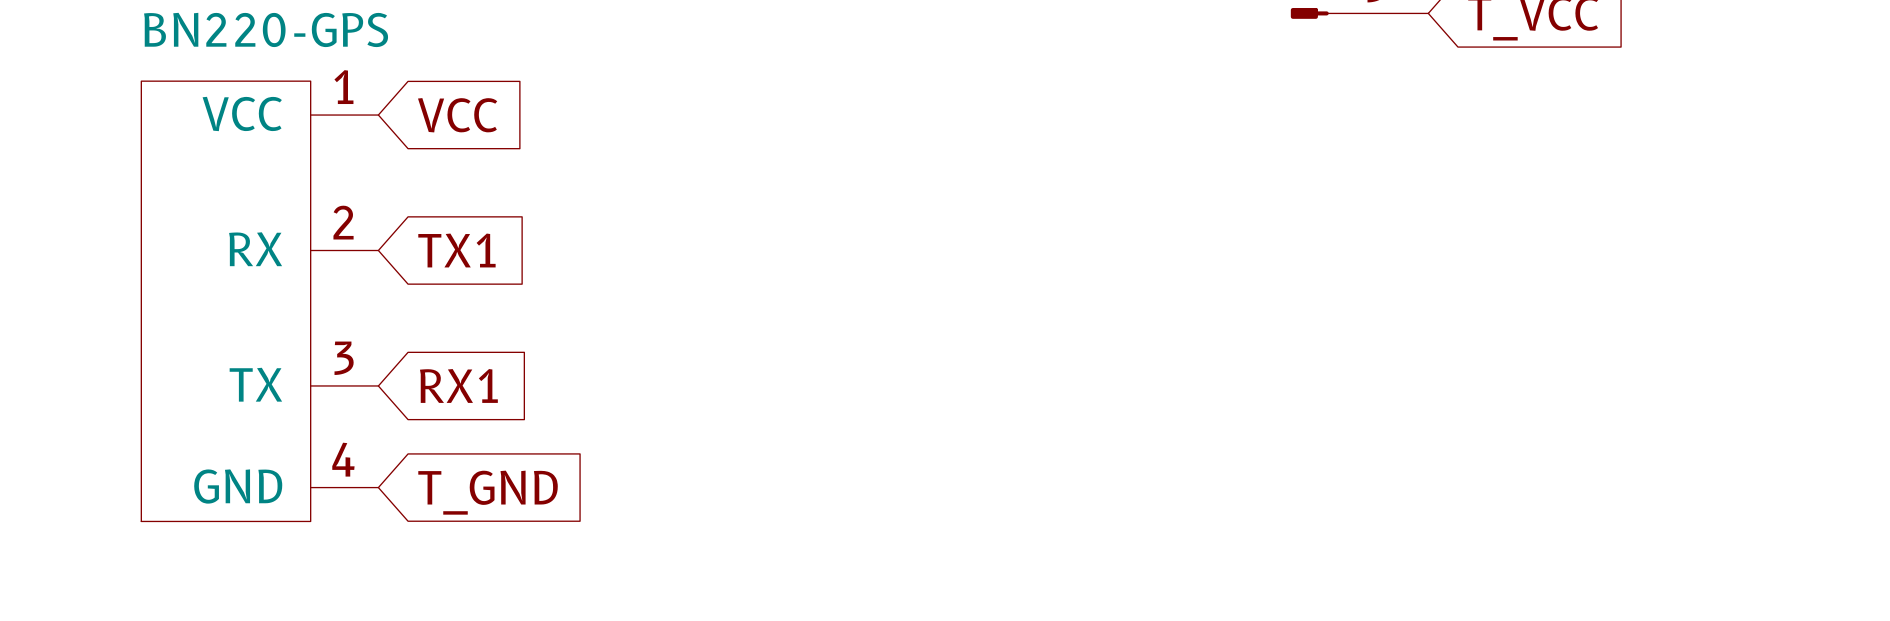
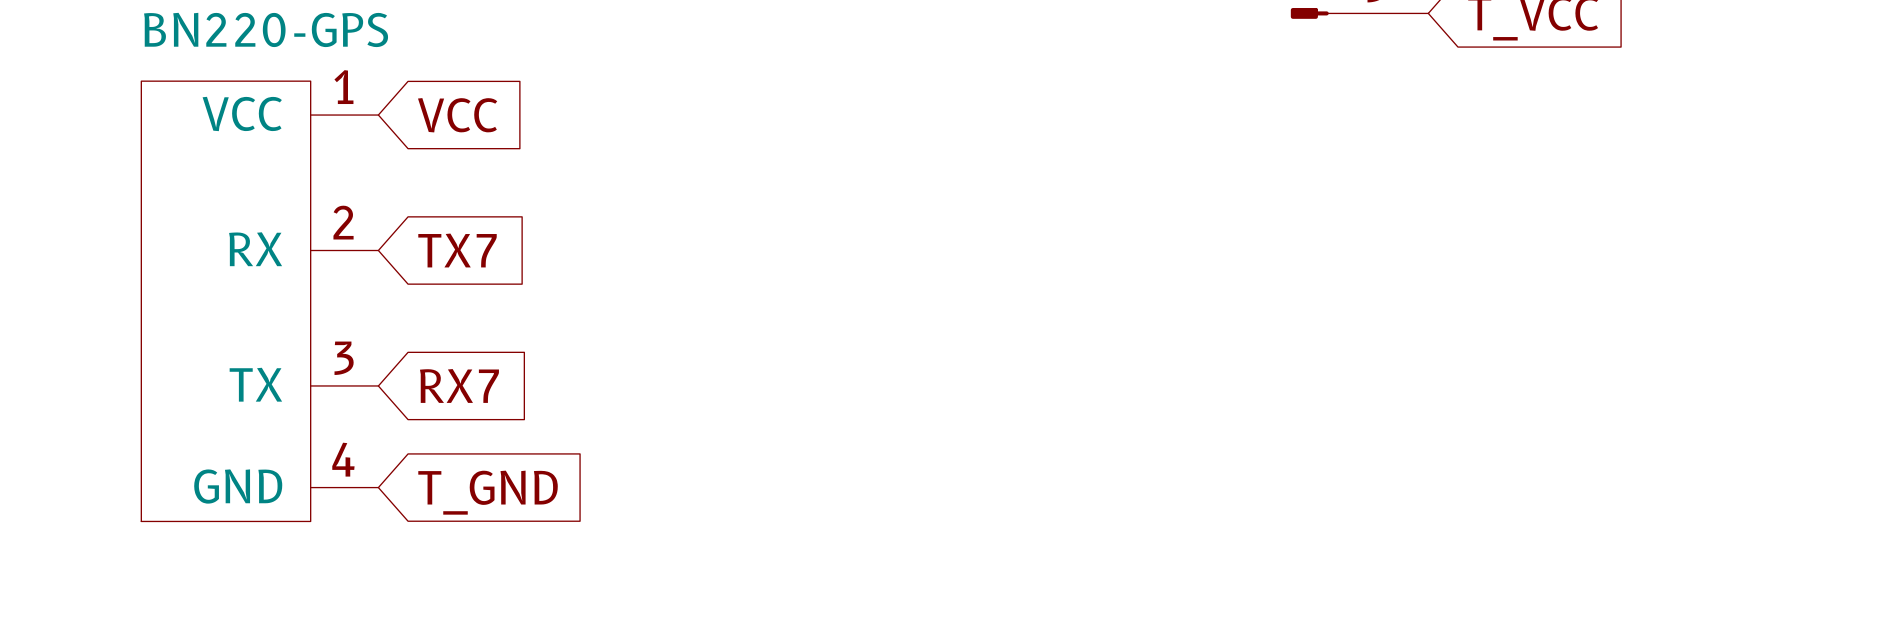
global label: TX1 (456, 250) -> TX7 (457, 250)
global label: RX1 (458, 385) -> RX7 (459, 385)

